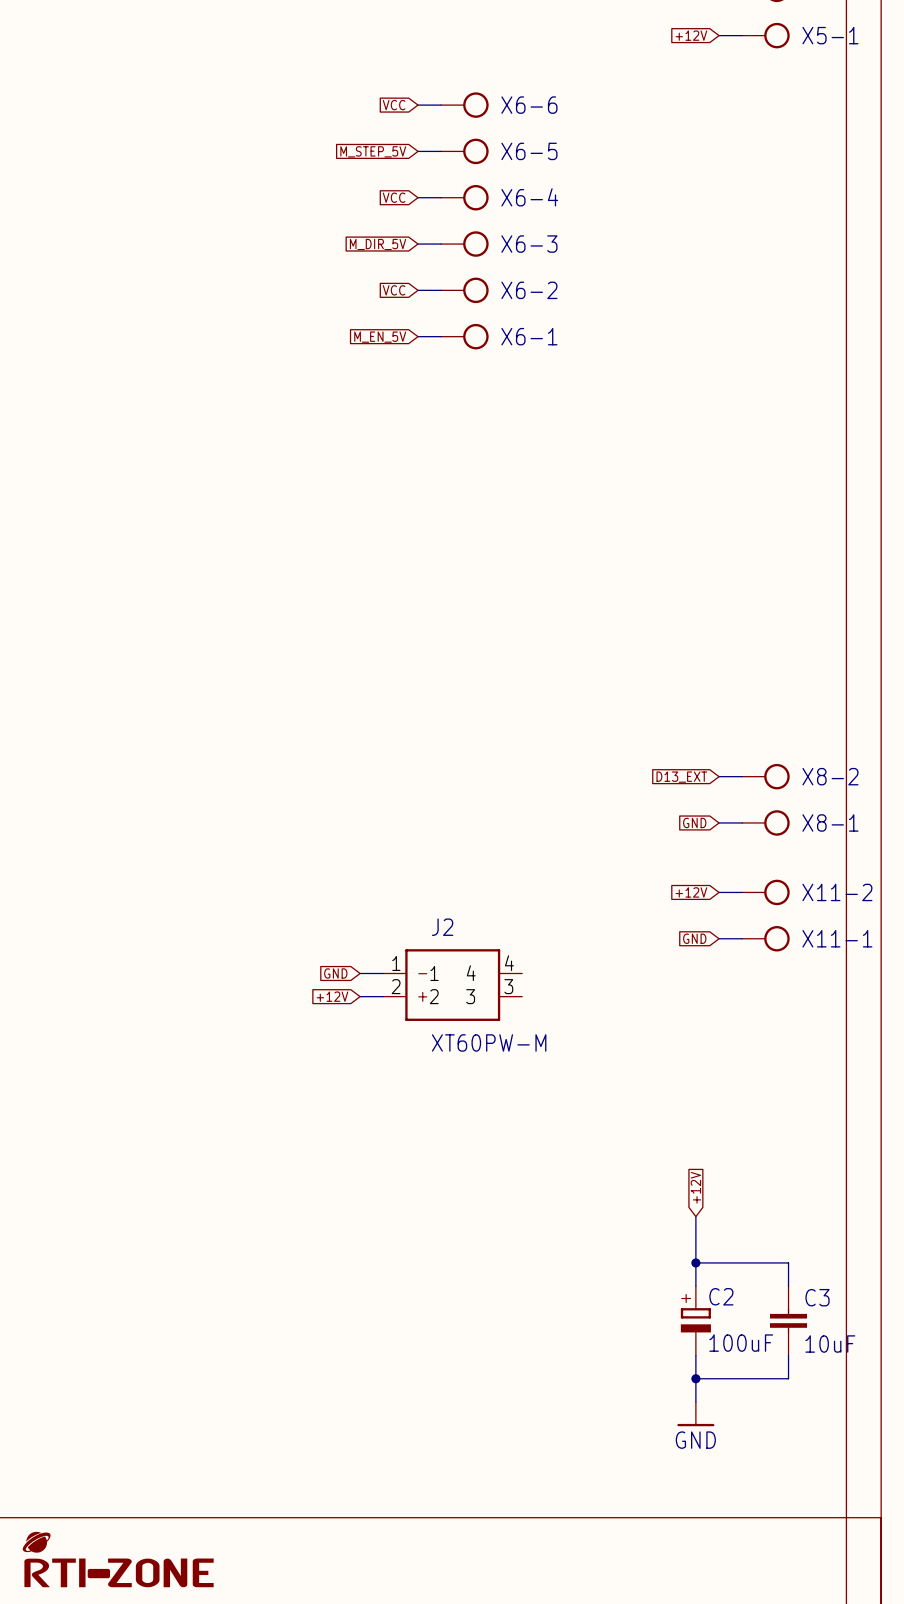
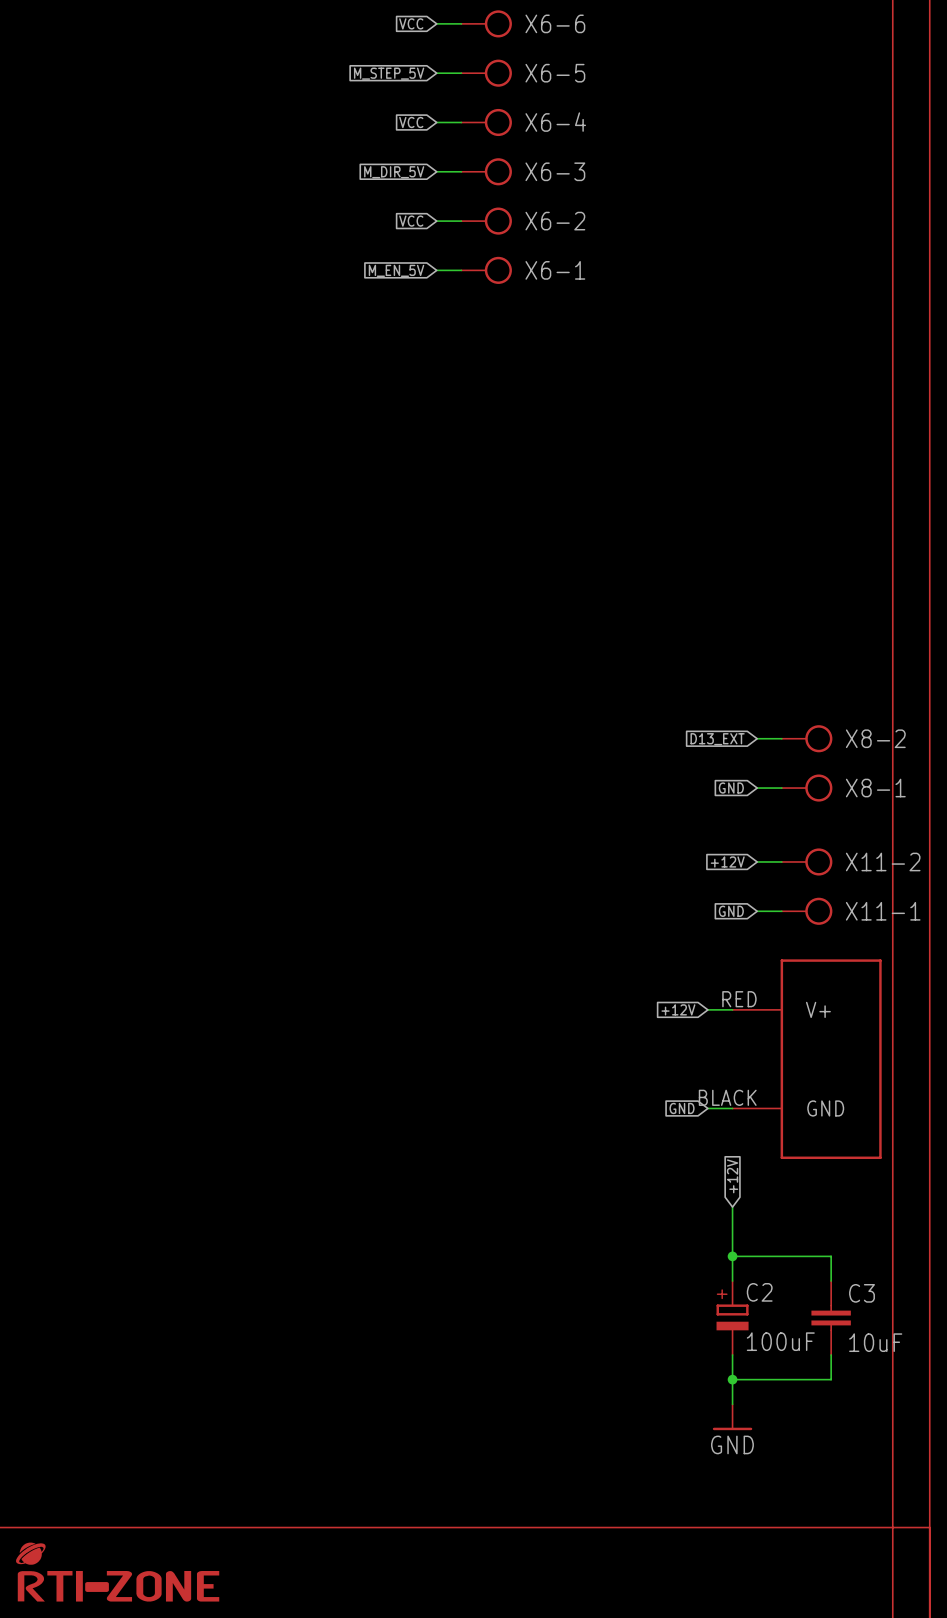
global label: GND (335, 973) -> none
wire: (360, 973) (383, 973) -> none
J2: XT60PW-M (452, 985) -> none
global label: +12V (332, 996) -> none
wire: (360, 996) (383, 996) -> none
global label: none -> +12V (678, 1009)
wire: none -> (707, 1009) (732, 1009)
part: none -> (807, 1059)
global label: none -> GND (682, 1108)
wire: none -> (707, 1108) (732, 1108)

